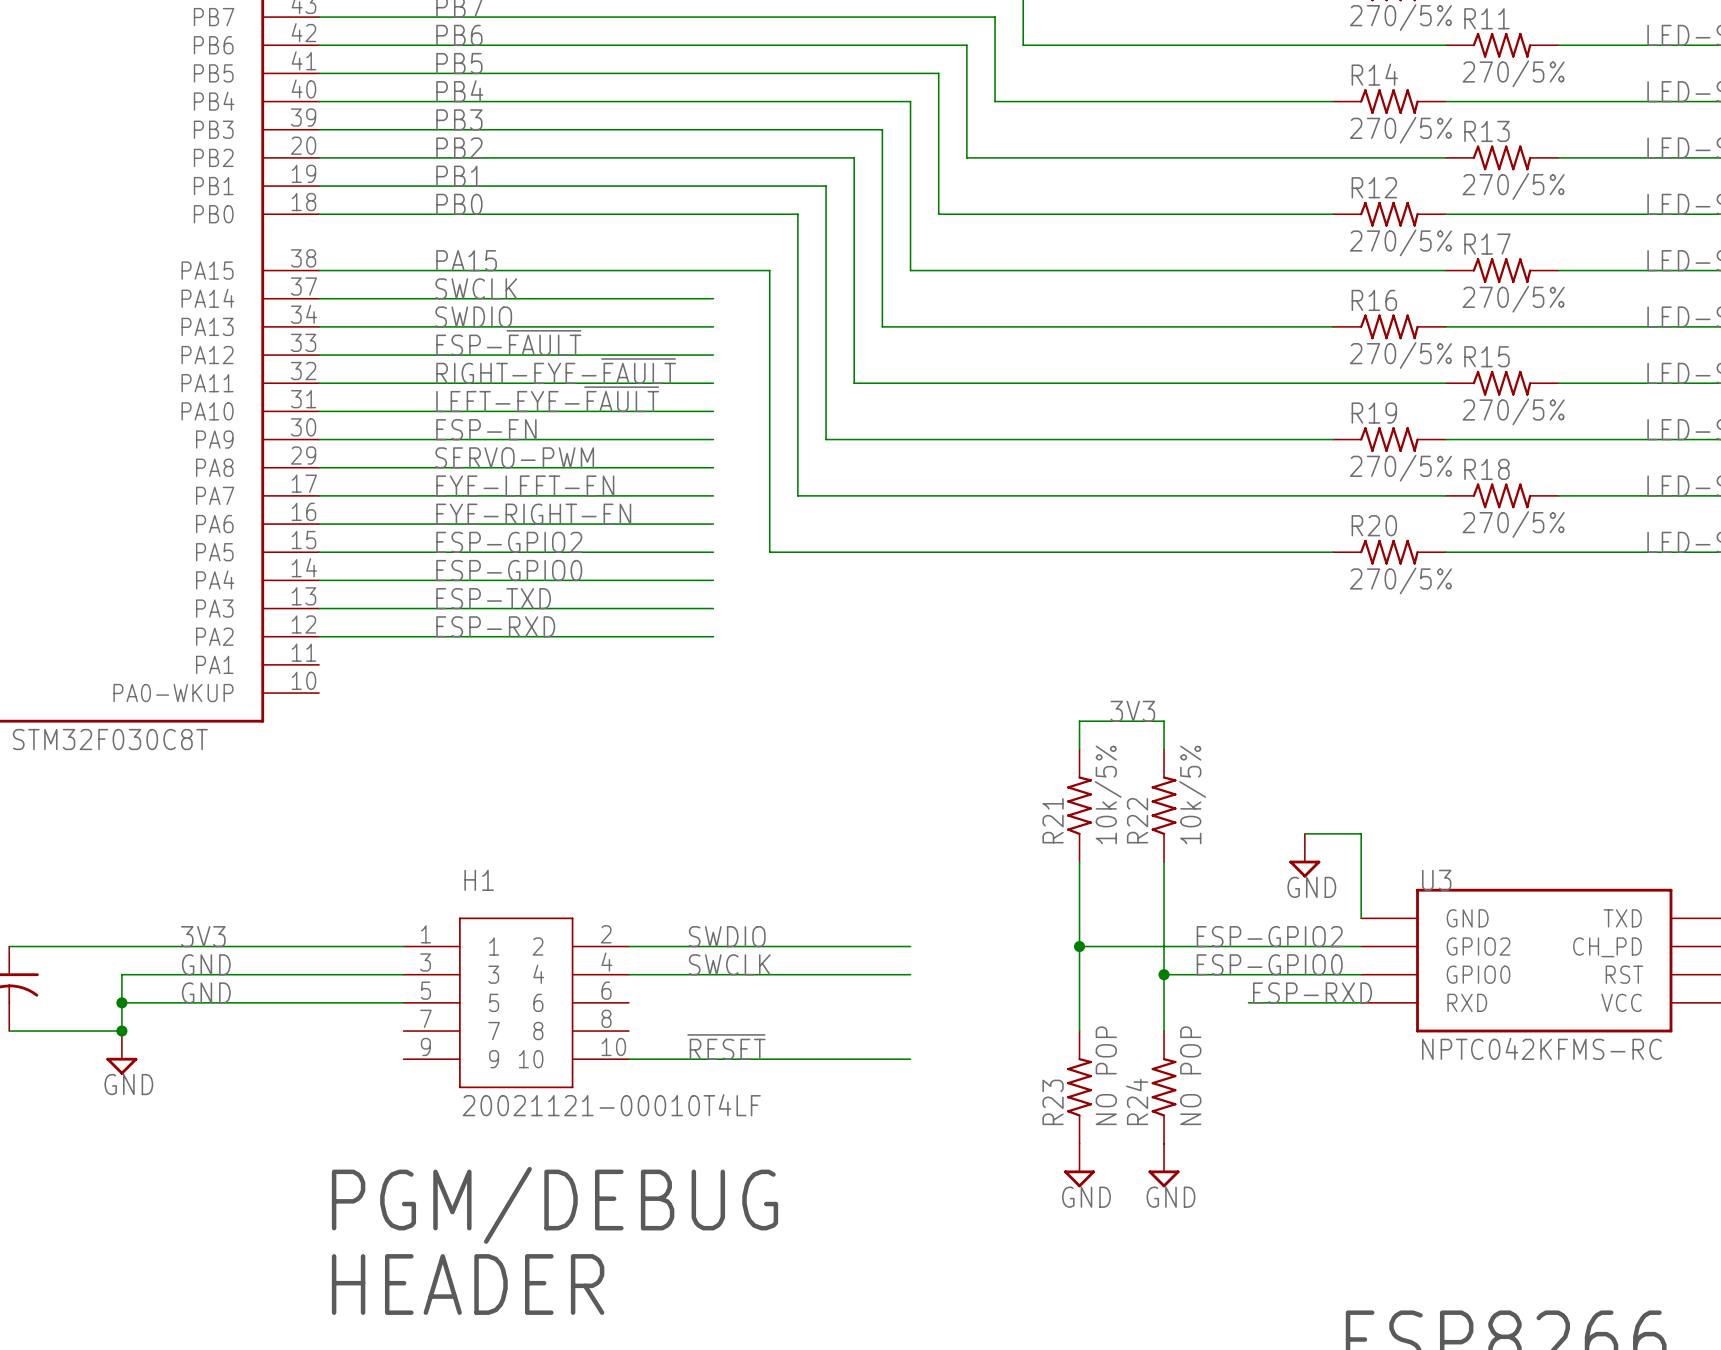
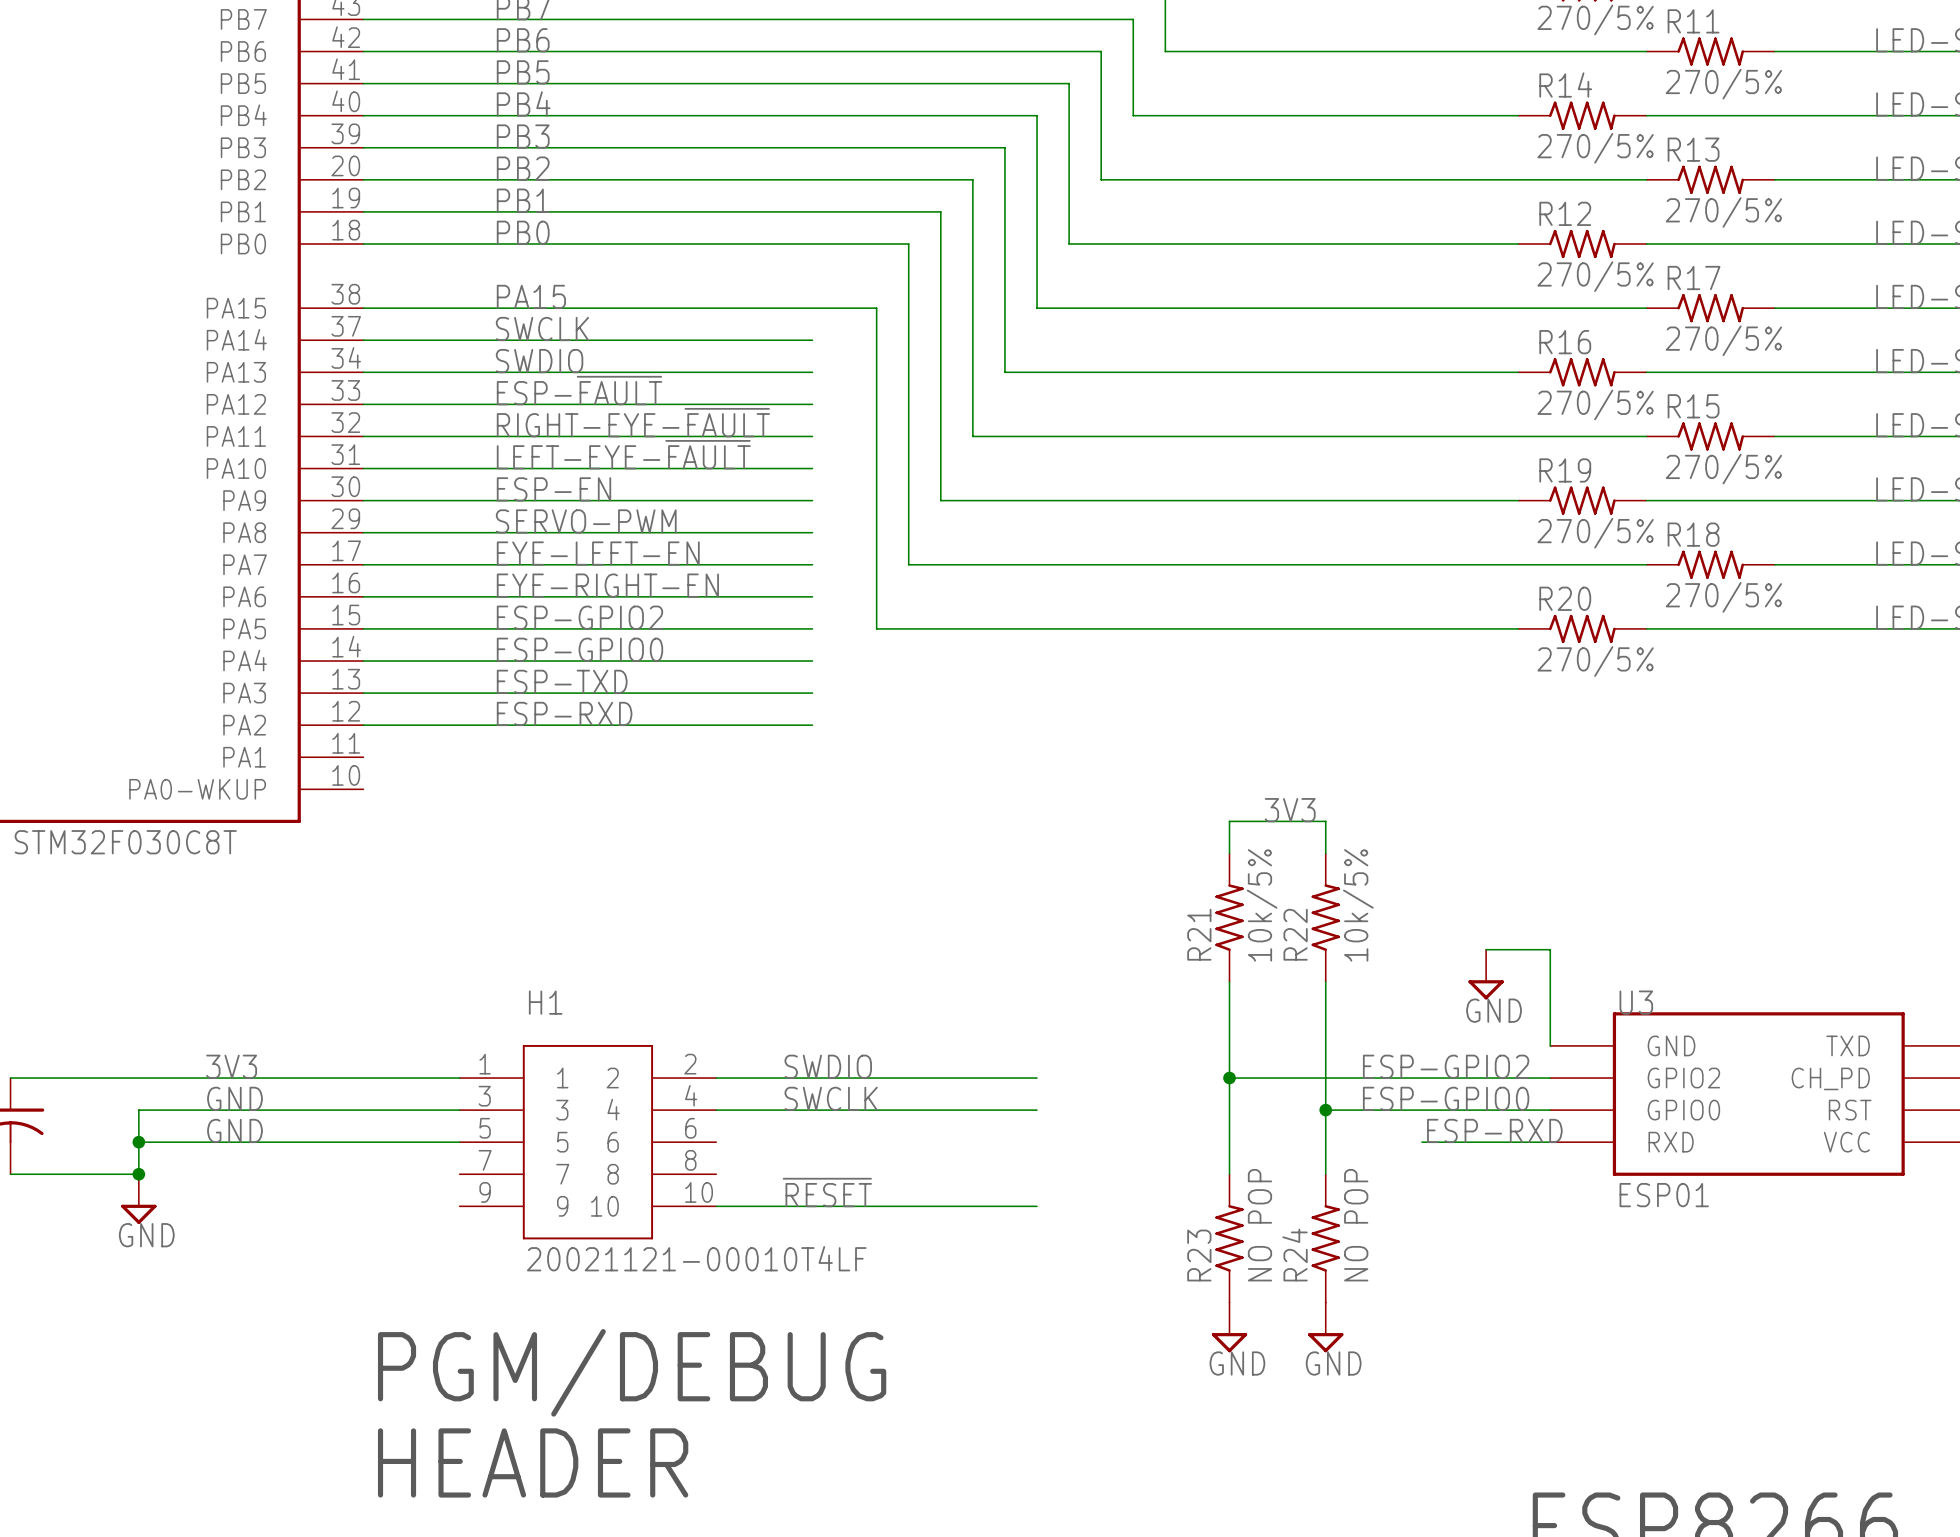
U3 value: NPTC042KFMS-RC (1541, 1048) -> ESP01 (1664, 1195)

